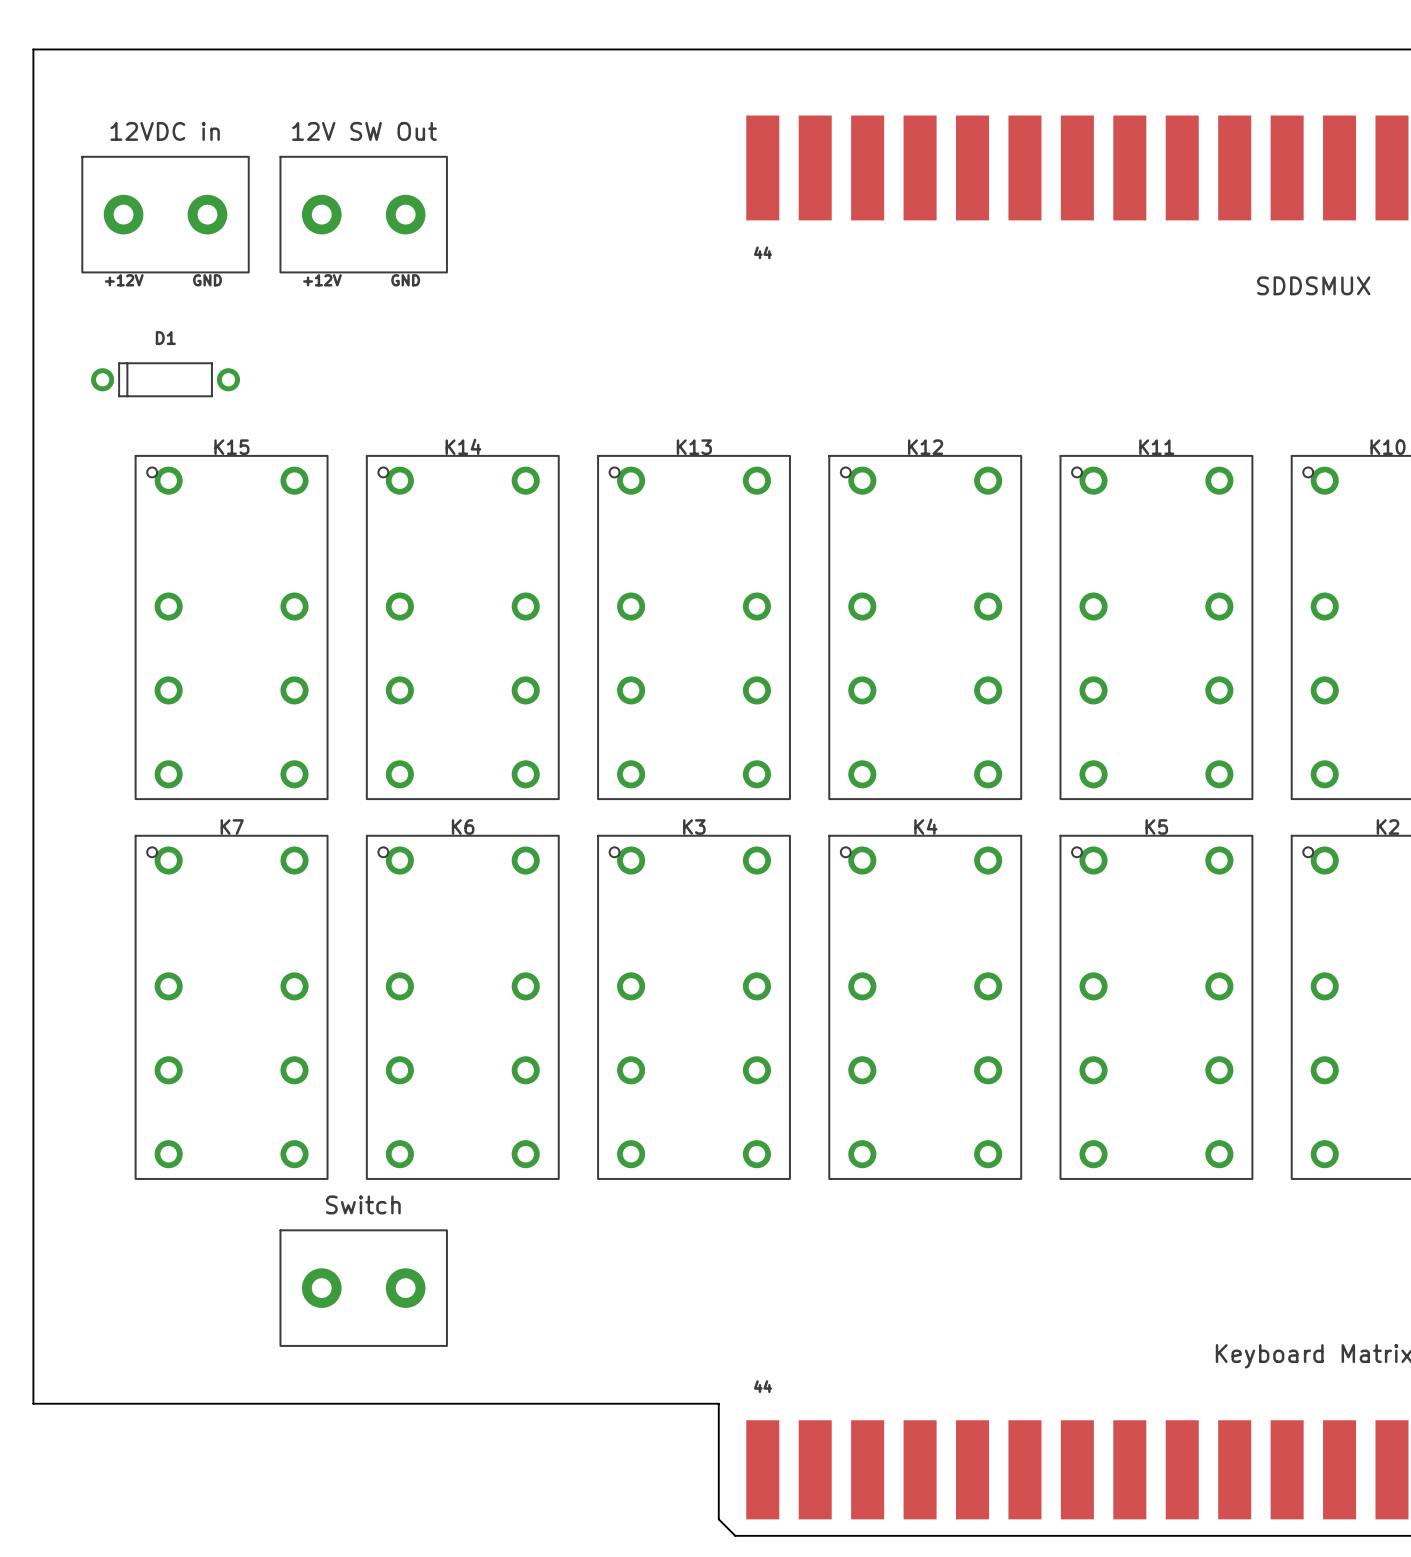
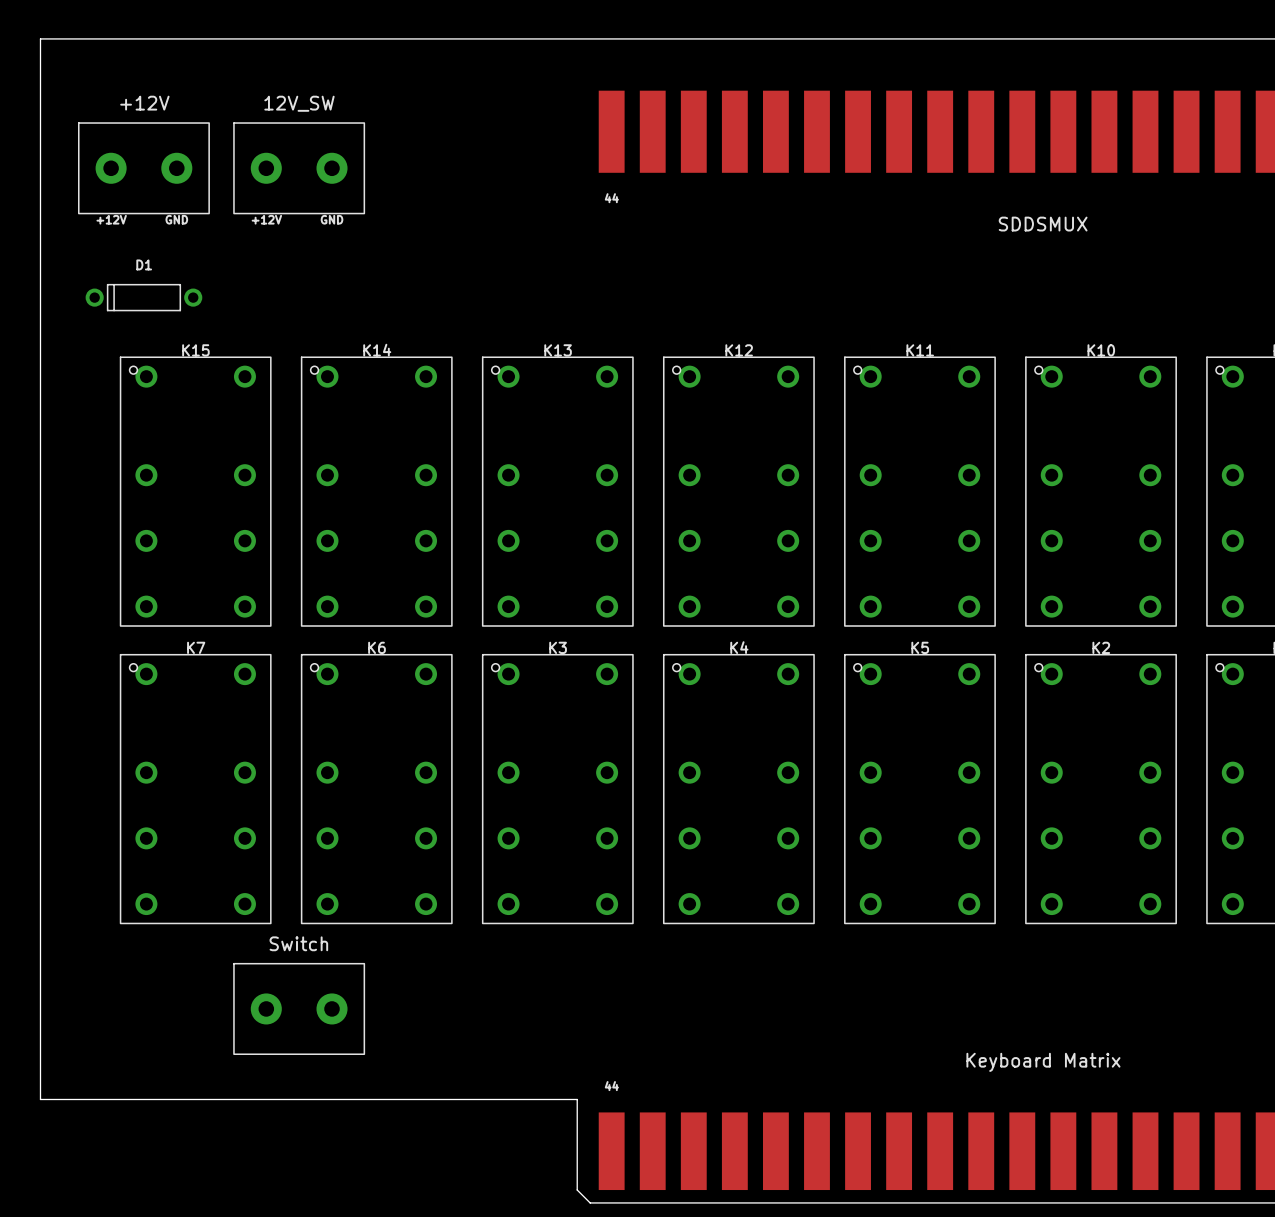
12VDC in name: 12VDC in (165, 131) -> +12V (144, 103)
12V SW Out name: 12V SW Out (364, 131) -> 12V_SW (299, 103)

